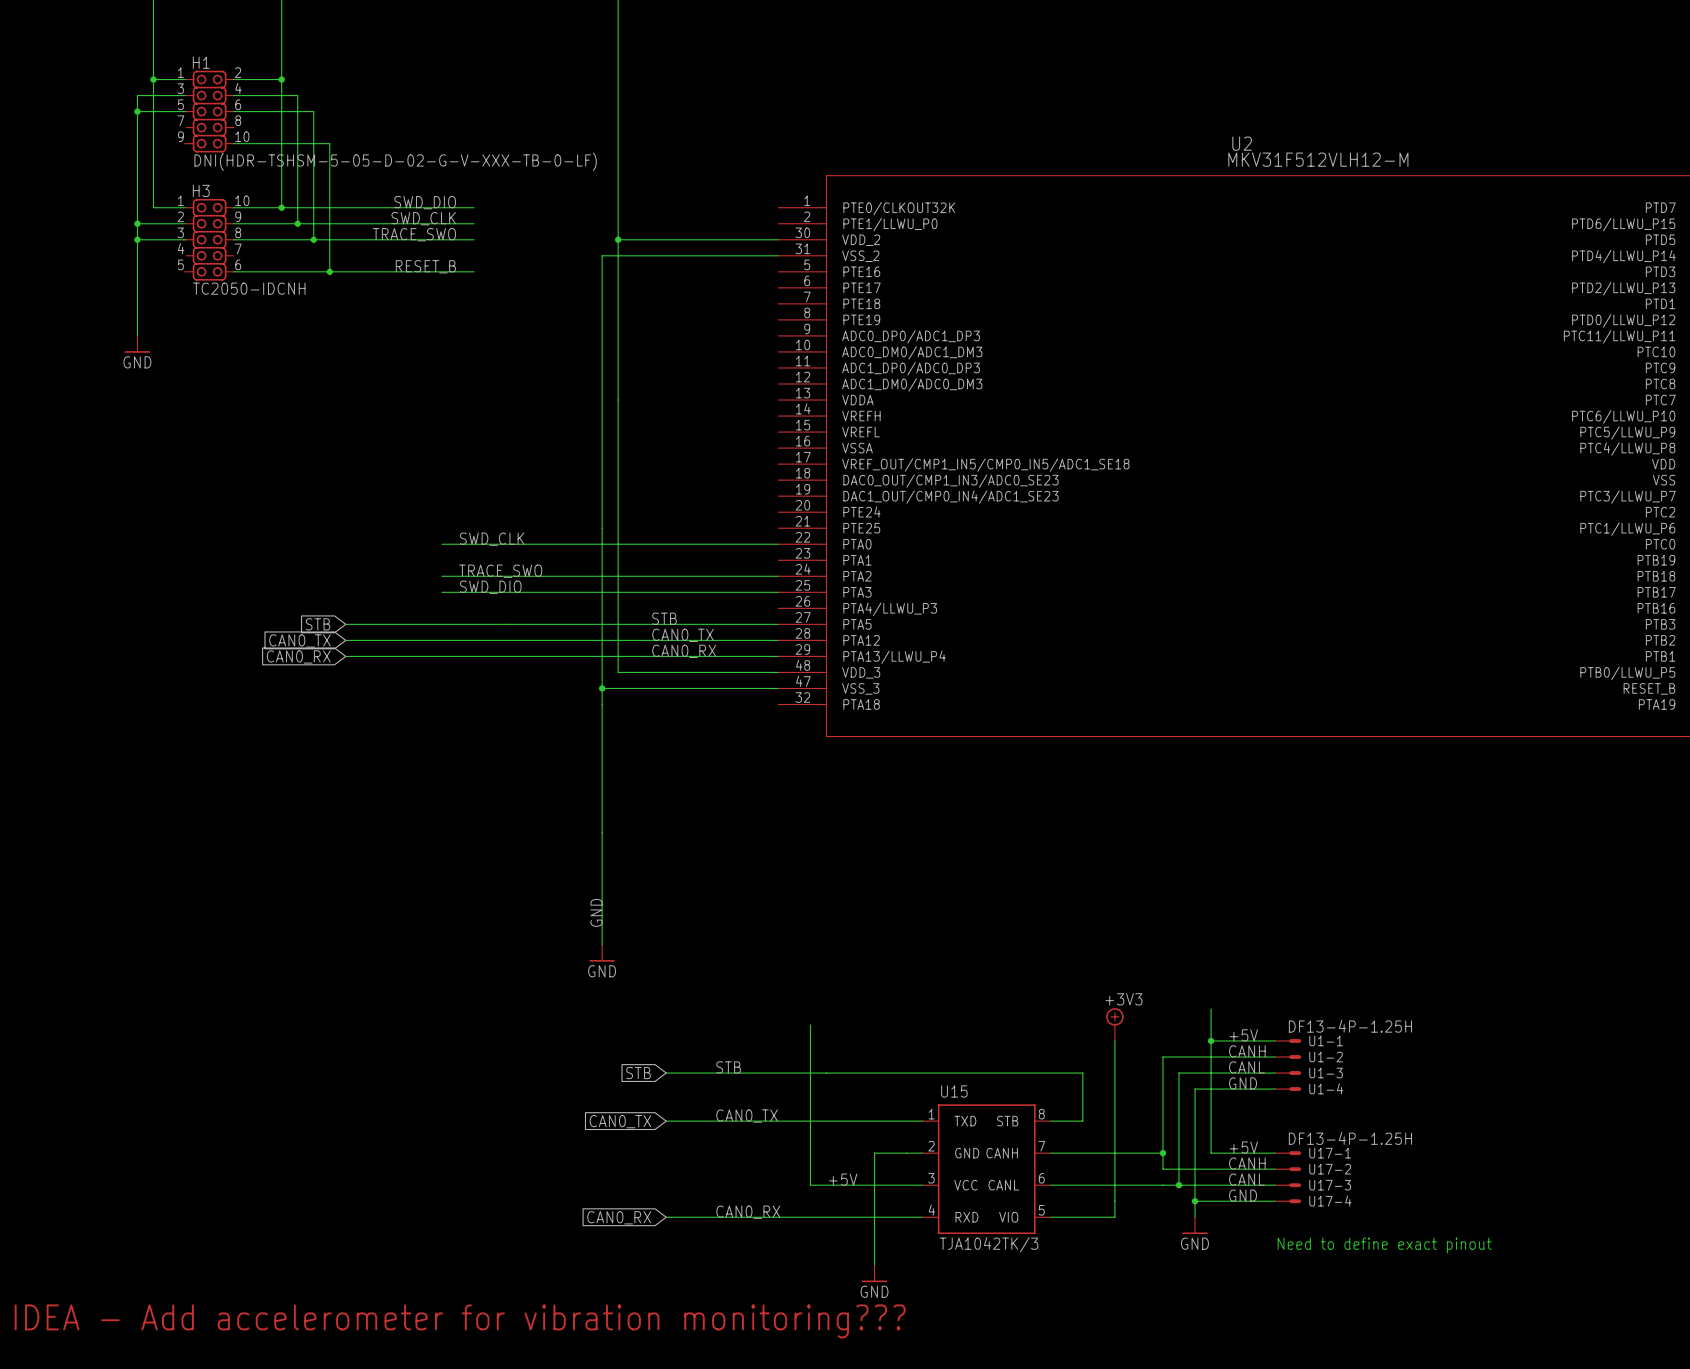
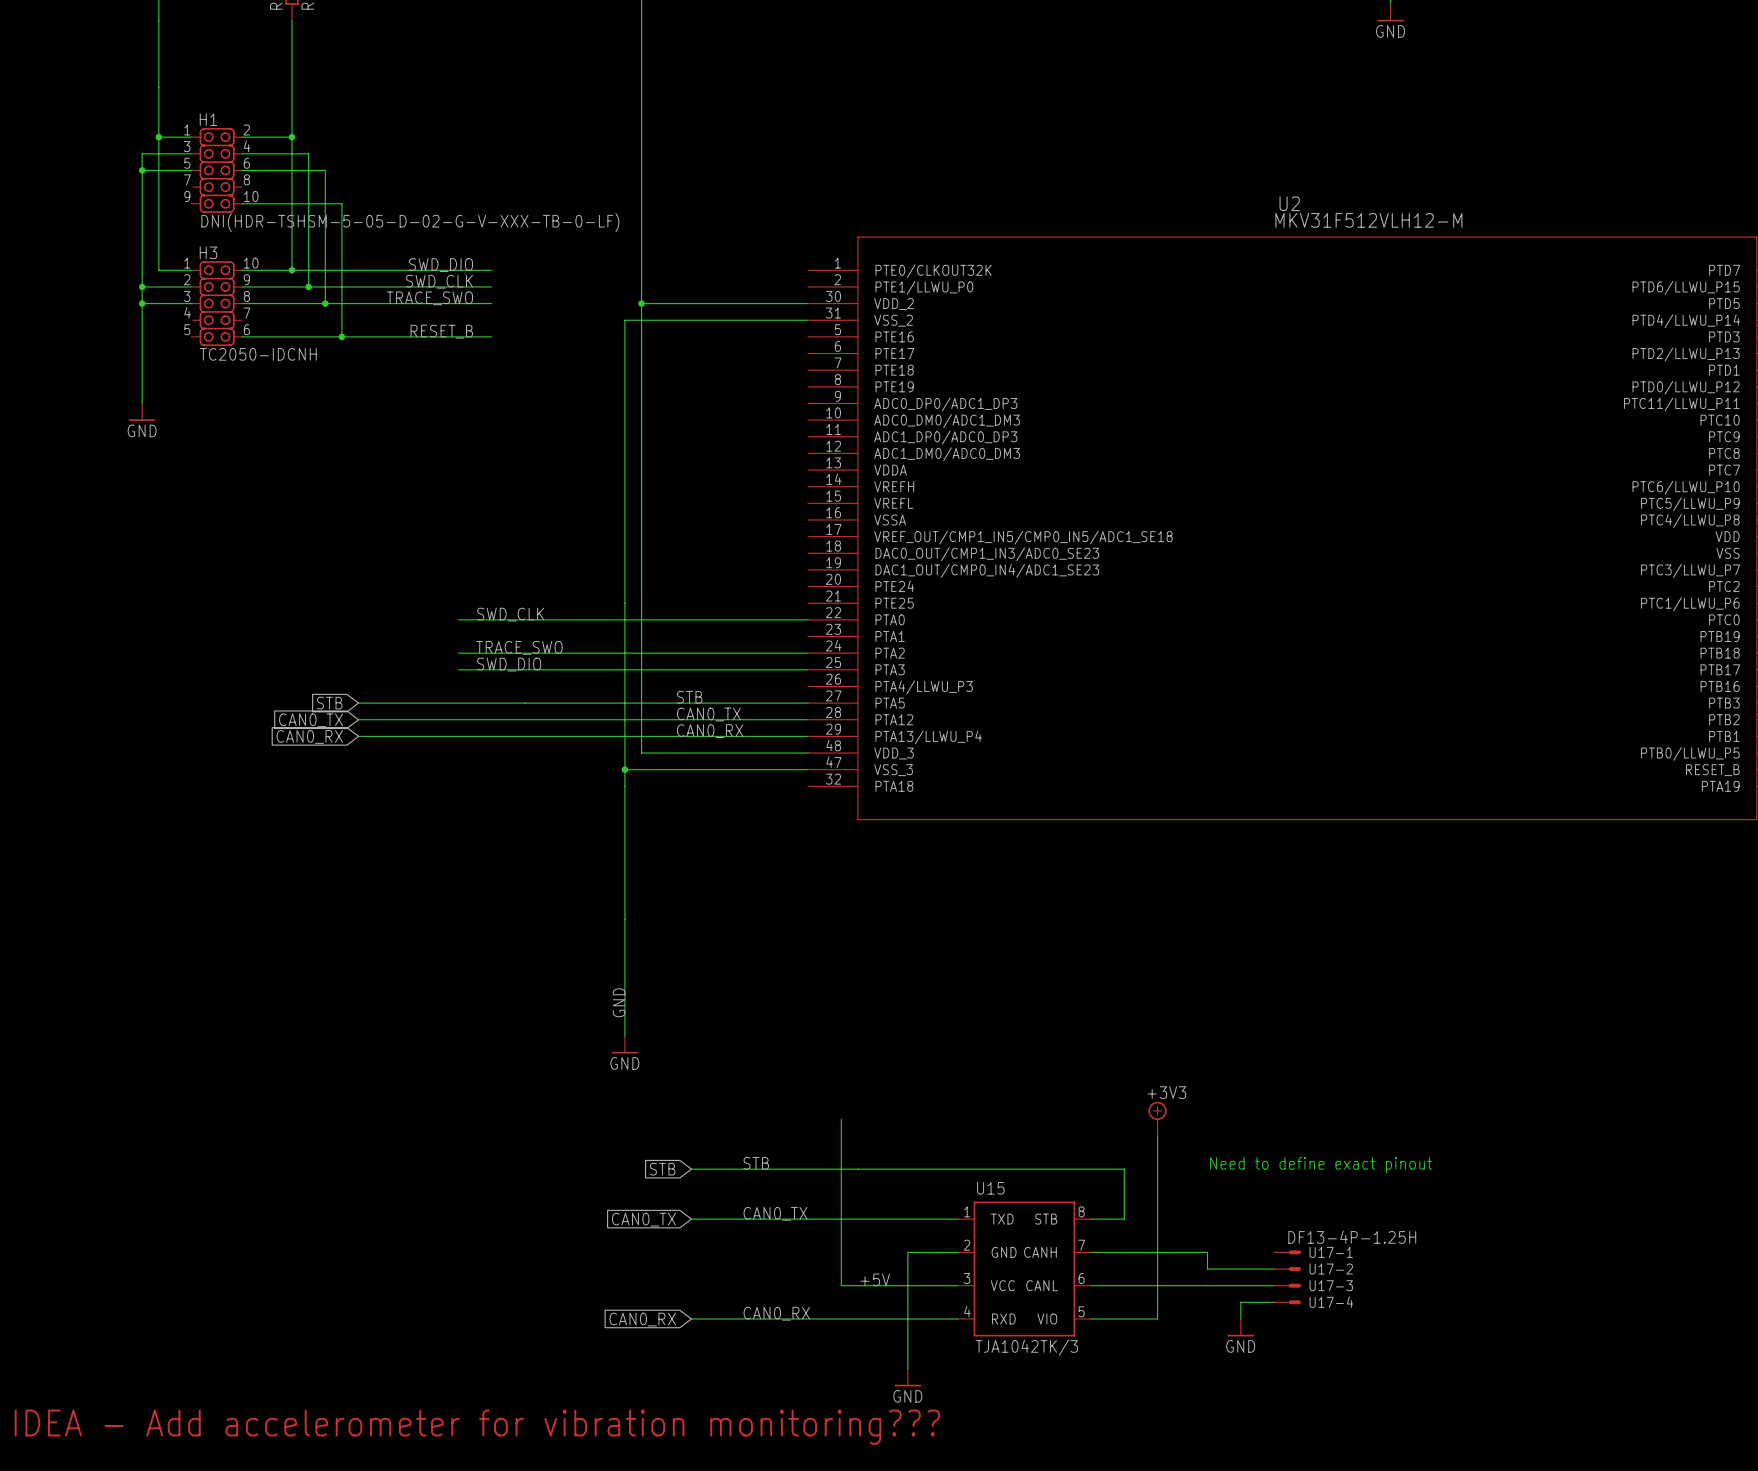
wire: (1211, 1008) (1211, 1153) (1275, 1153) -> none
label: +5V (1243, 1035) -> none
wire: (1211, 1040) (1275, 1040) -> none
junction: (1211, 1040) -> none
U1-1: DF13-4P-1.25H (1288, 1040) -> none
label: CANH (1247, 1051) -> none
wire: (1275, 1057) (1162, 1057) (1162, 1153) -> none
U1-2: (1288, 1057) -> none
label: CANL (1246, 1067) -> none
text: none -> Need to define exact pinout (1321, 1165)
wire: (1275, 1073) (1179, 1073) (1179, 1185) -> none
U1-3: (1288, 1073) -> none
label: GND (1243, 1083) -> none
wire: (1275, 1089) (1195, 1089) (1195, 1201) -> none
U1-4: (1288, 1089) -> none
label: +5V (1243, 1147) -> none
junction: (1162, 1153) -> none
U17-1 position: (1288, 1153) -> (1287, 1252)
label: CANH (1247, 1163) -> none
U17-2 position: (1288, 1169) -> (1287, 1269)
label: CANL (1246, 1179) -> none
junction: (1179, 1185) -> none
U17-3 position: (1288, 1185) -> (1287, 1285)
label: GND (1243, 1195) -> none
junction: (1195, 1201) -> none
U17-4 position: (1288, 1201) -> (1287, 1302)
text: Need to define exact pinout (1384, 1245) -> none

